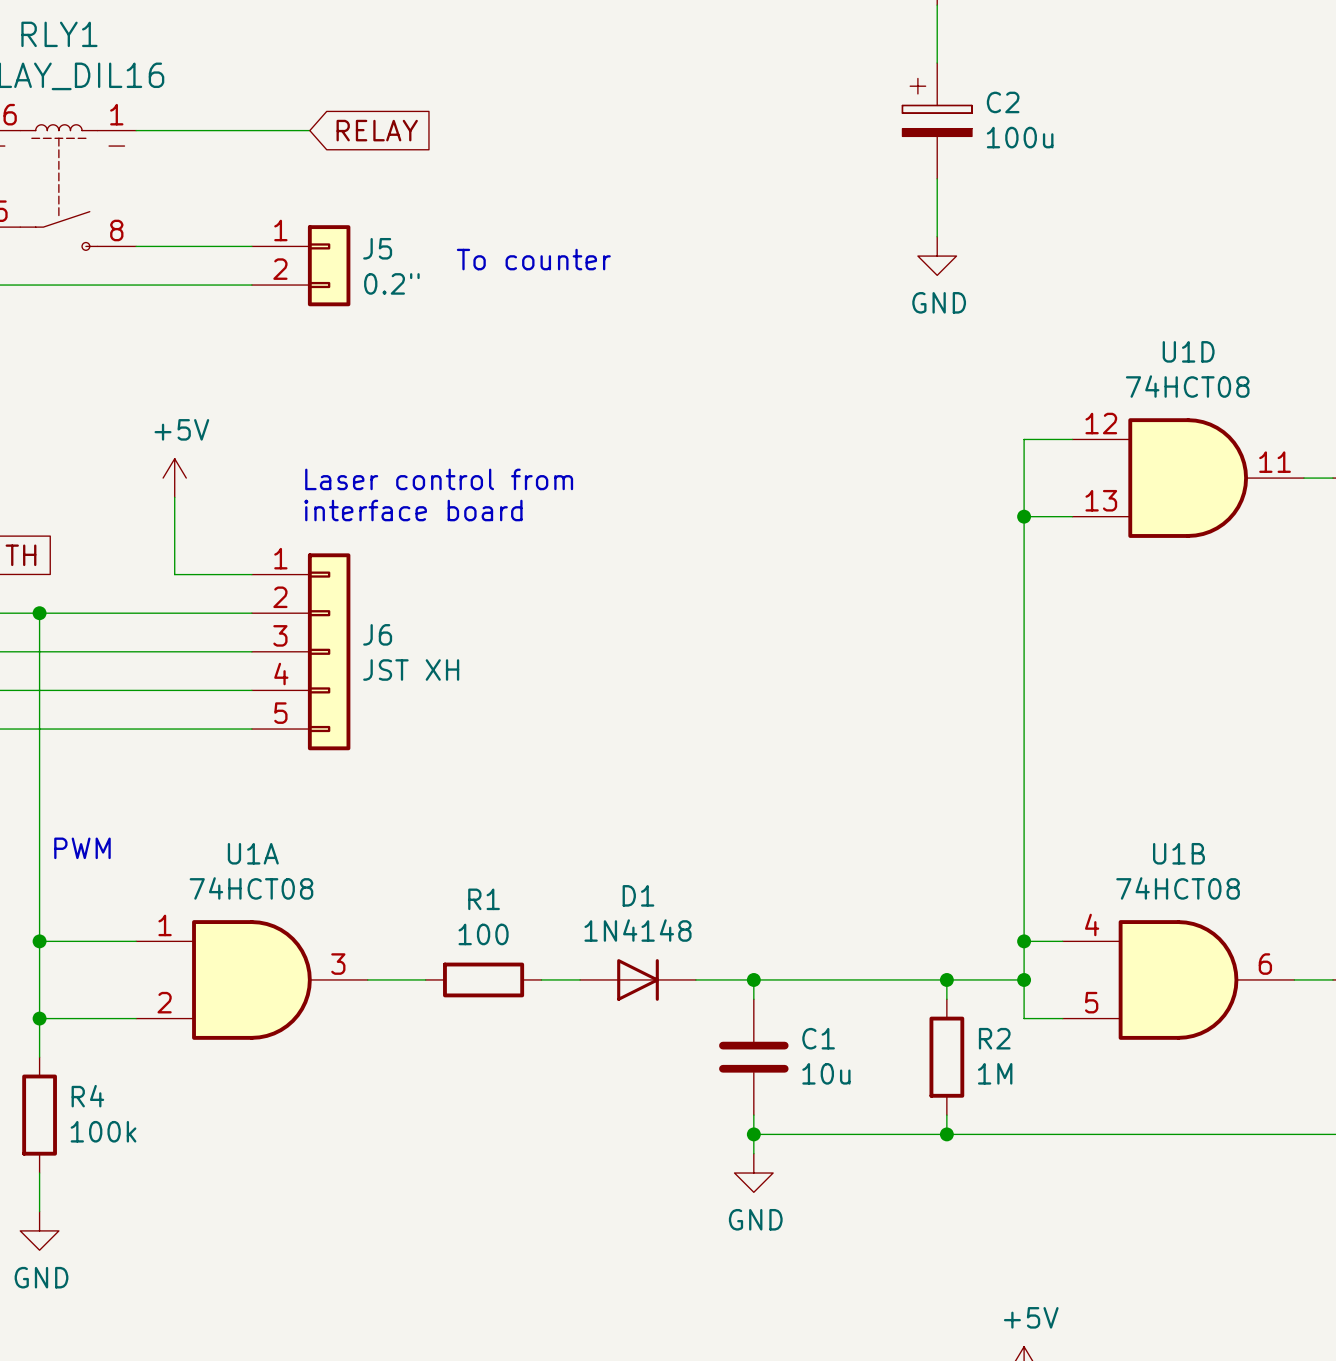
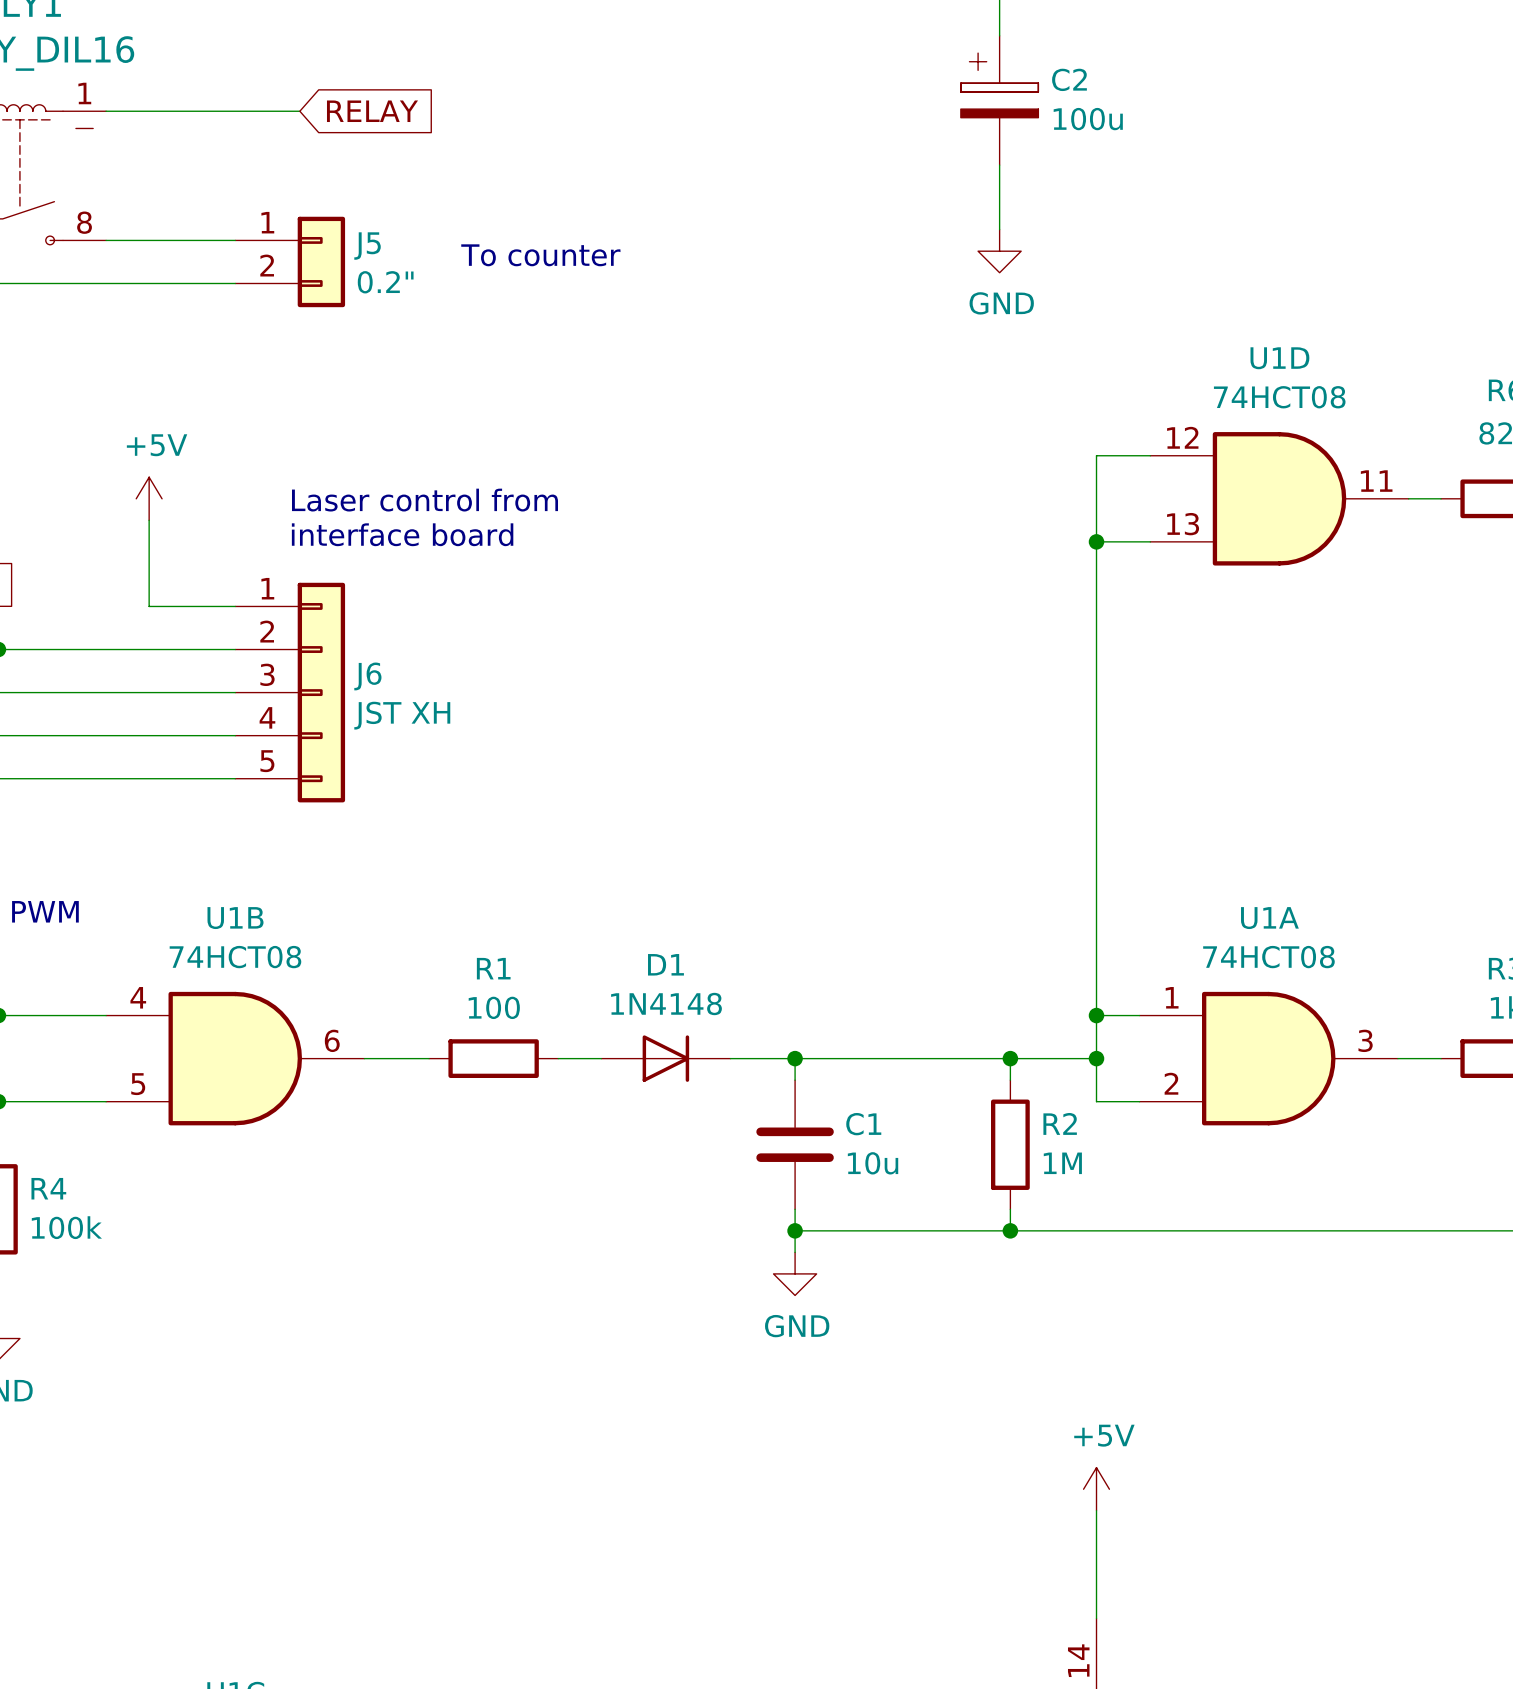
U1A position: (251, 979) -> (1268, 1058)
U1B position: (1178, 979) -> (235, 1058)

